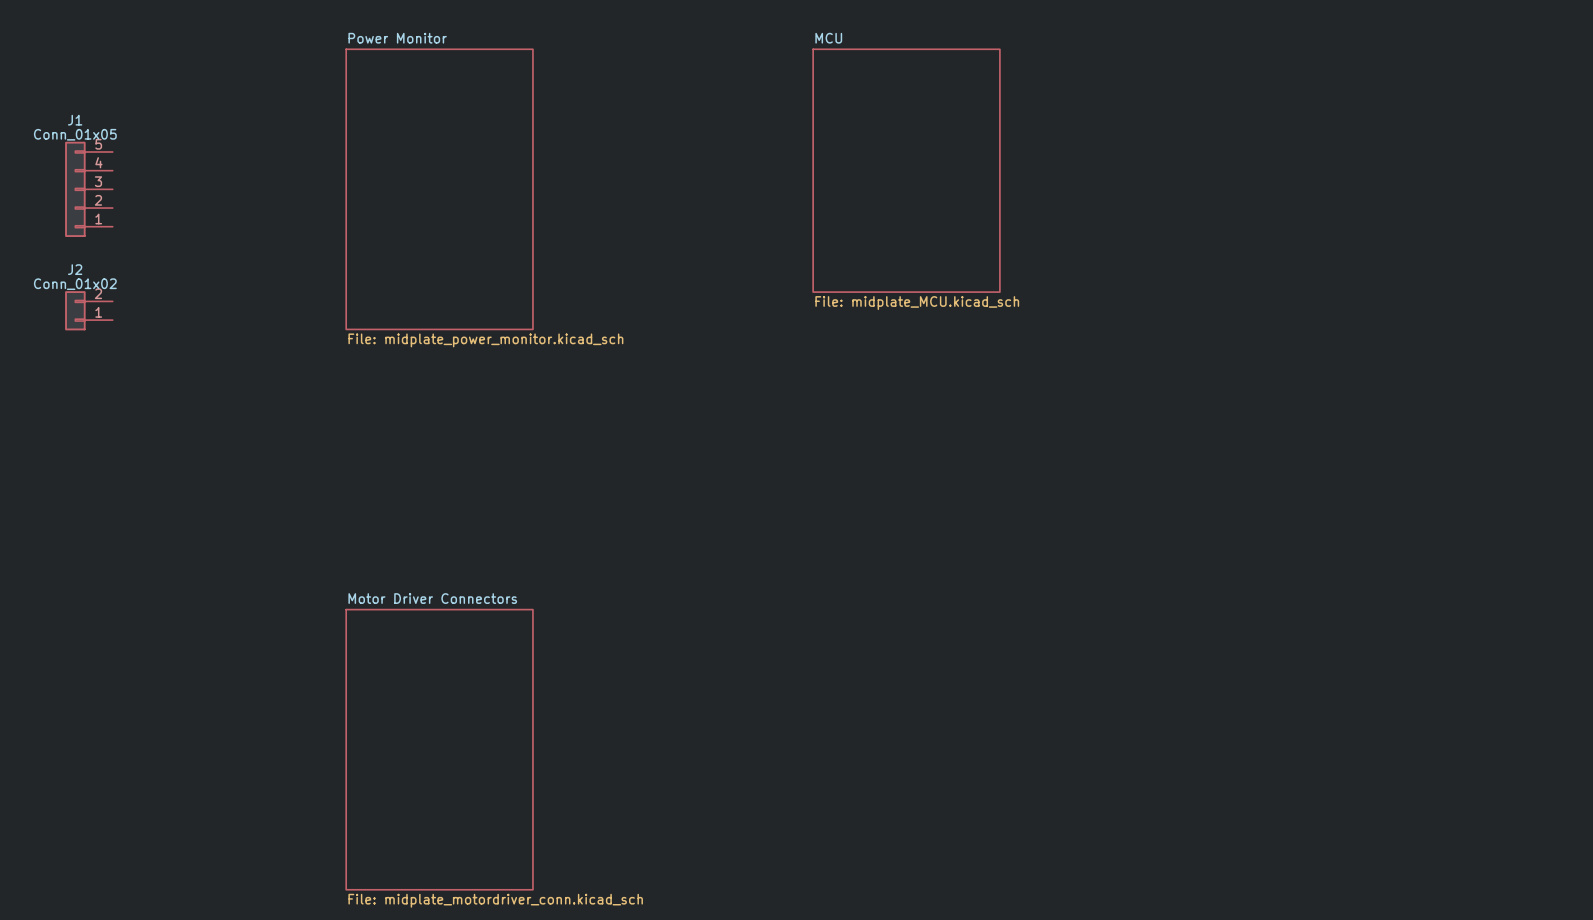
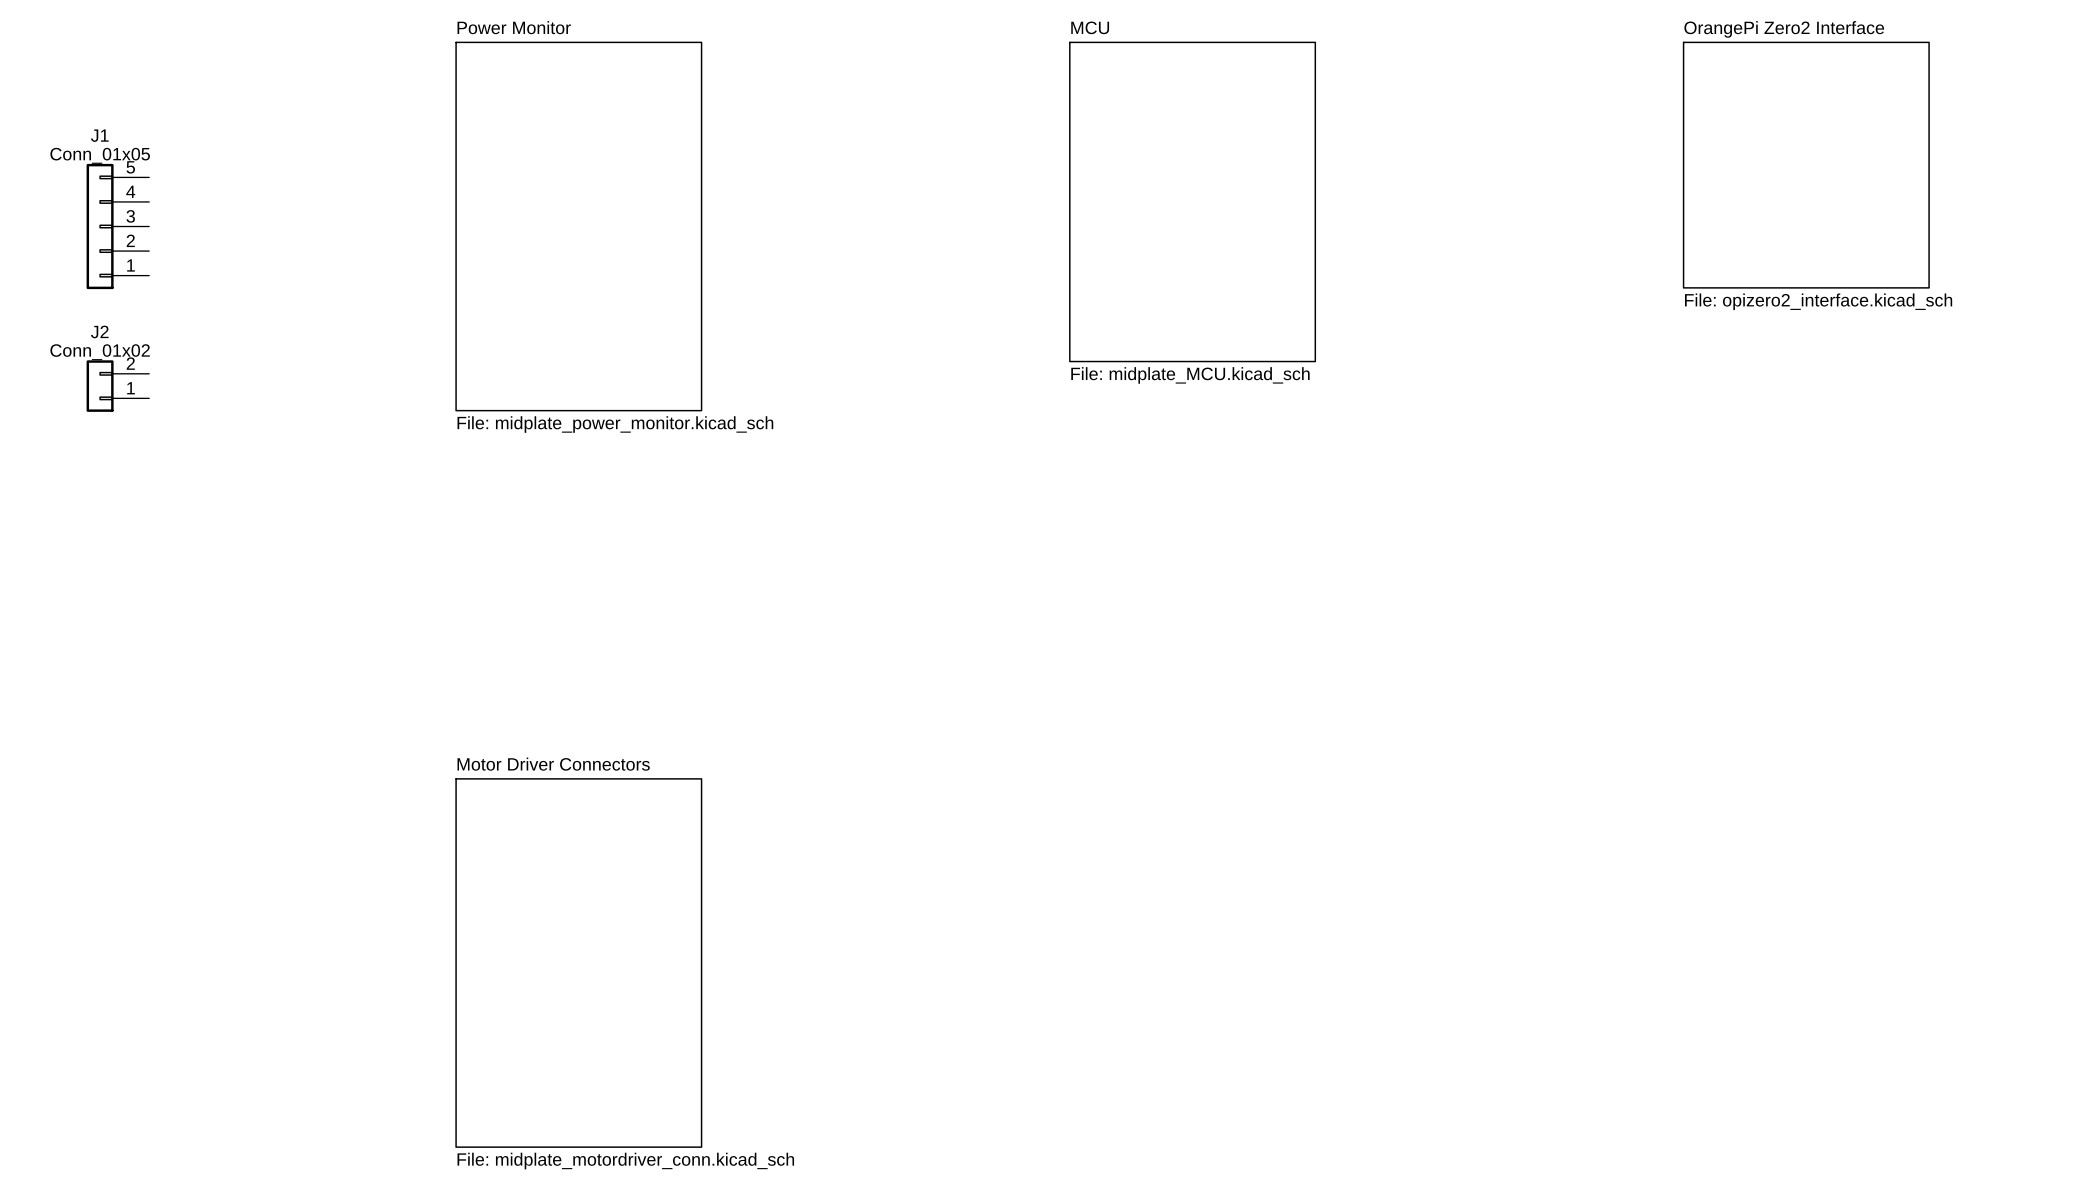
sheet OrangePi Zero2 Interface: none -> File: opizero2_interface.kicad_sch (1806, 165)

